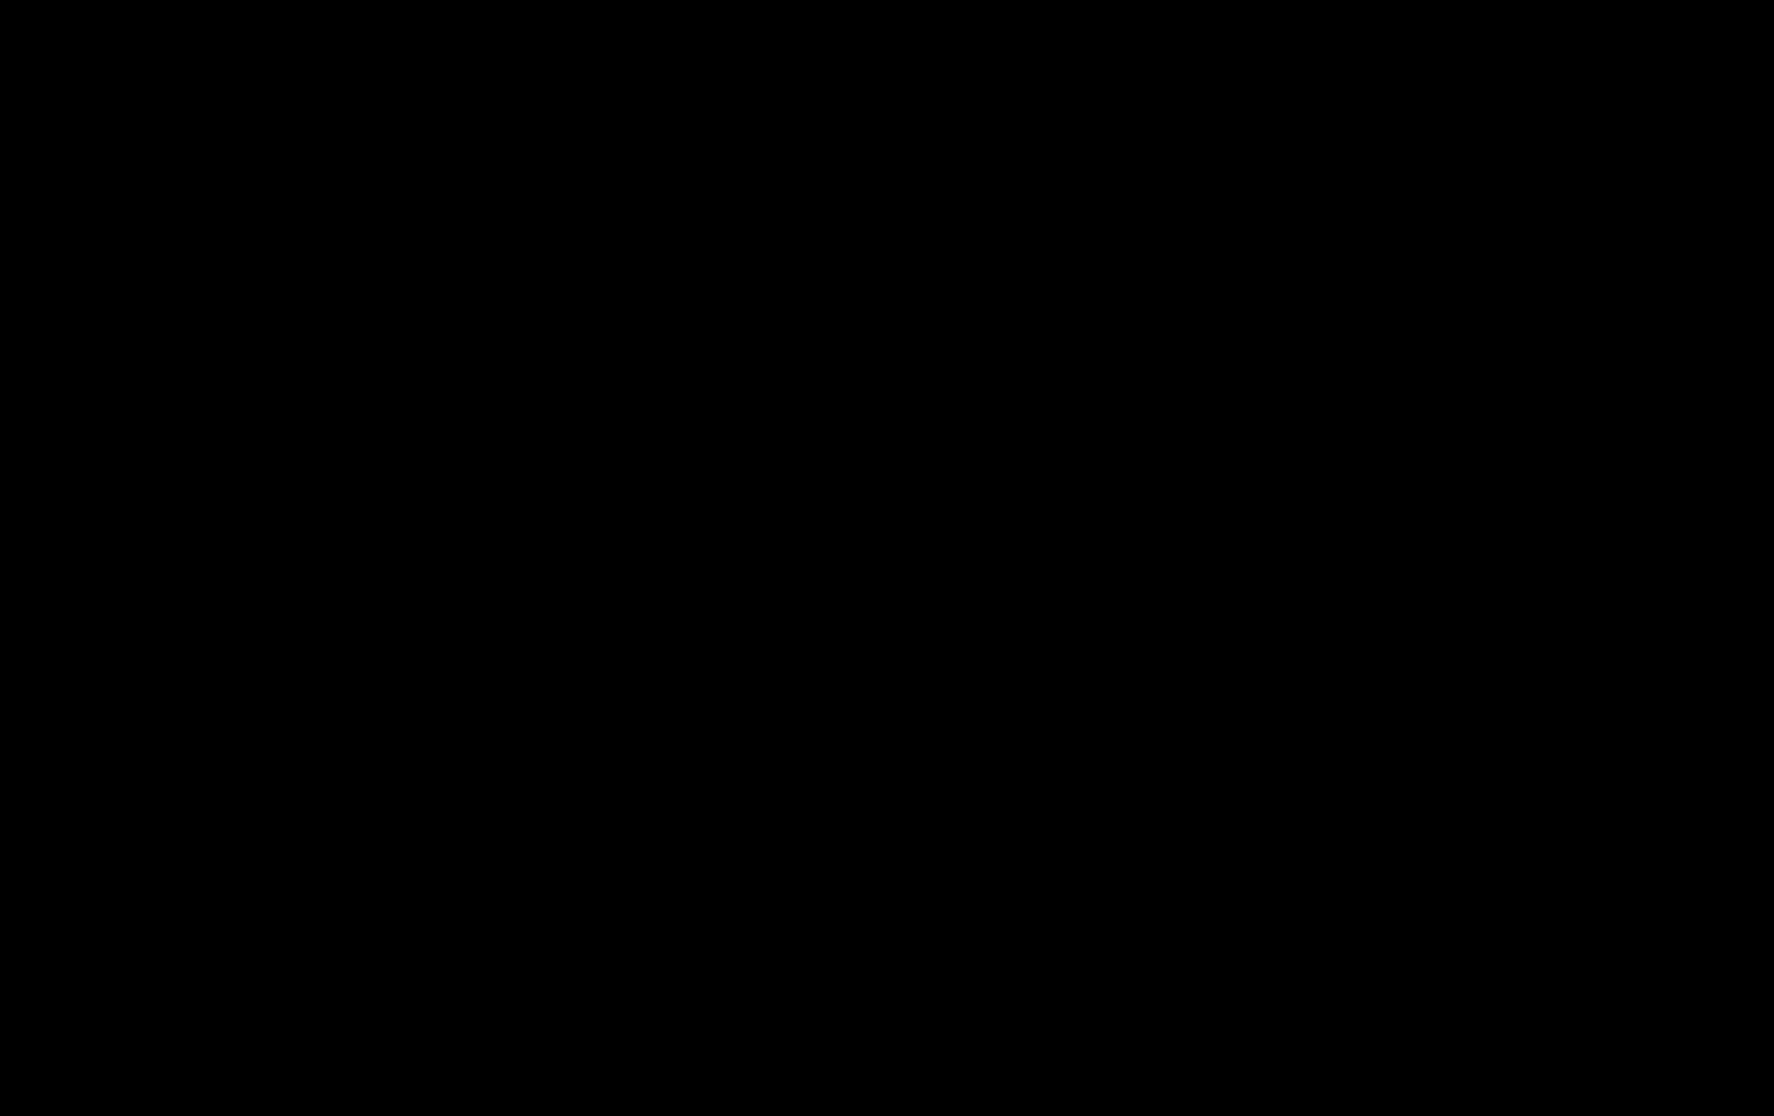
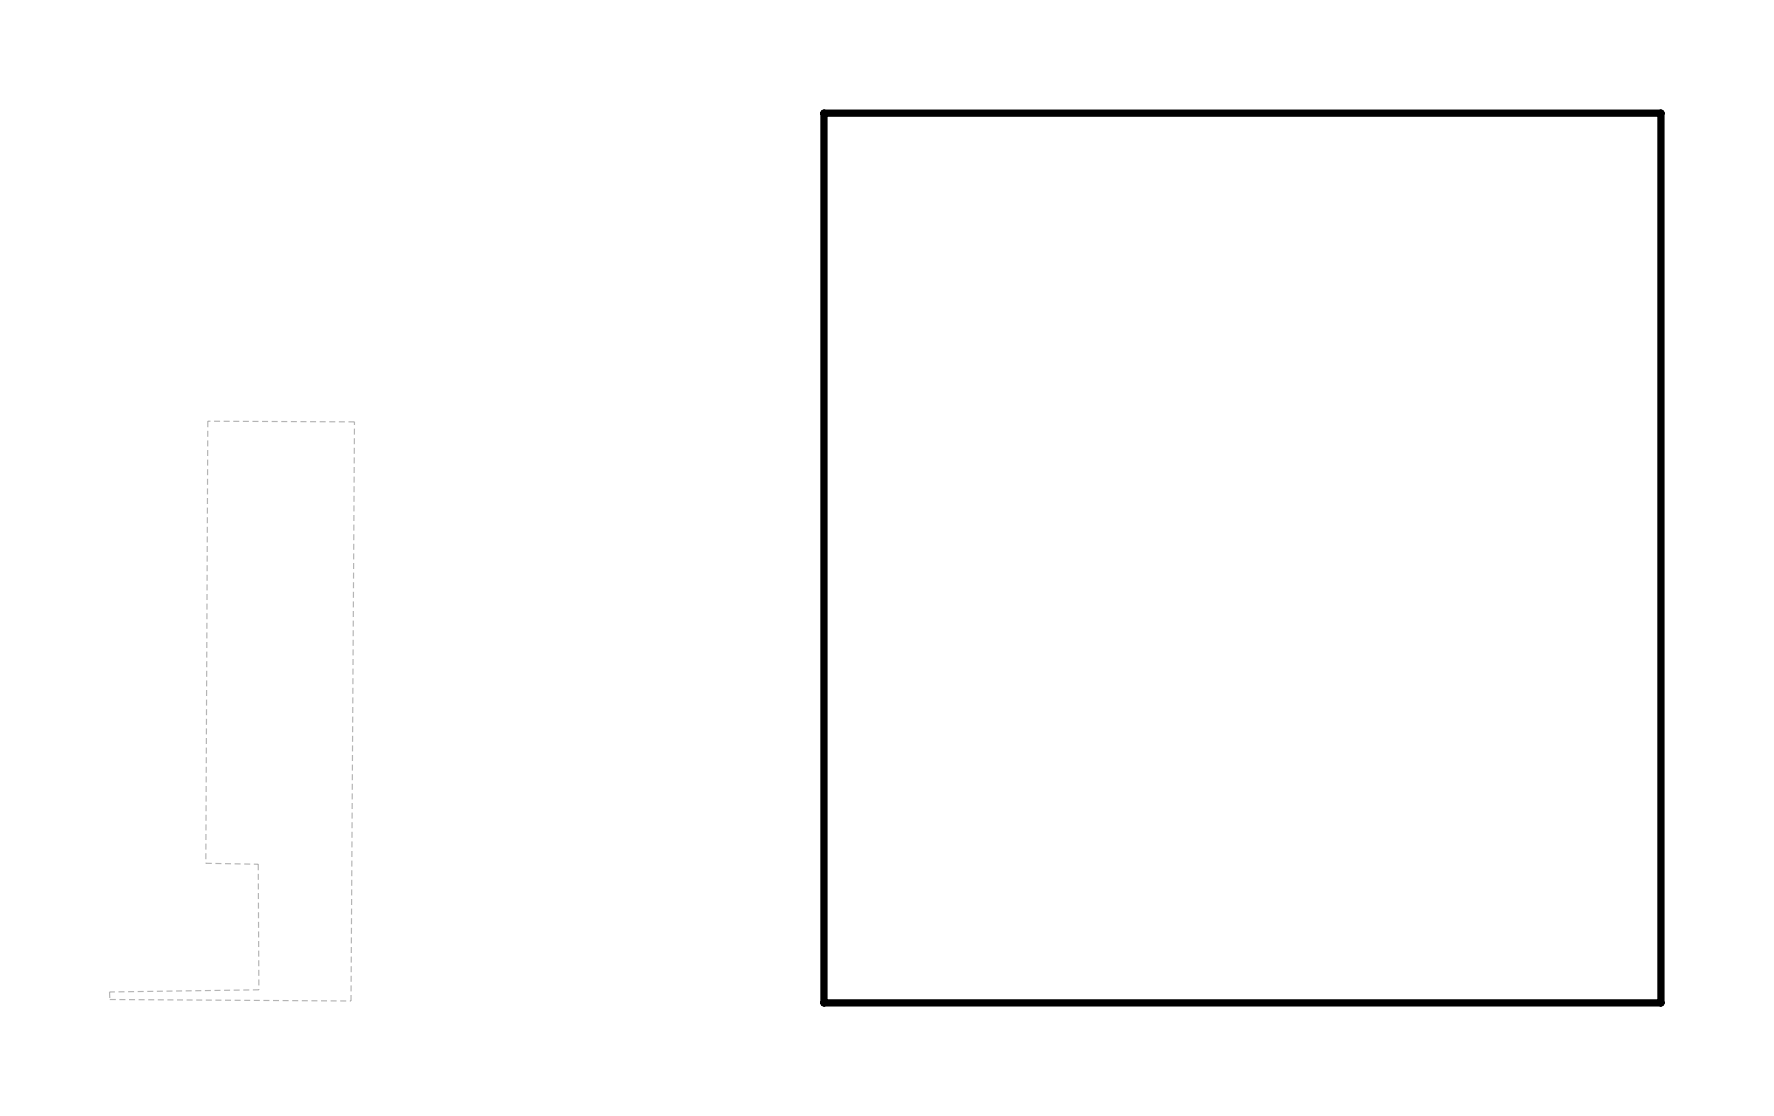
board edge: none -> (823, 113) (1660, 113) (1660, 1002) (823, 1002) (823, 113)
zone outline: none -> (207, 421) (354, 421) (351, 1001) (109, 999) (109, 991) (258, 989) (258, 864) (205, 863) (207, 421)

